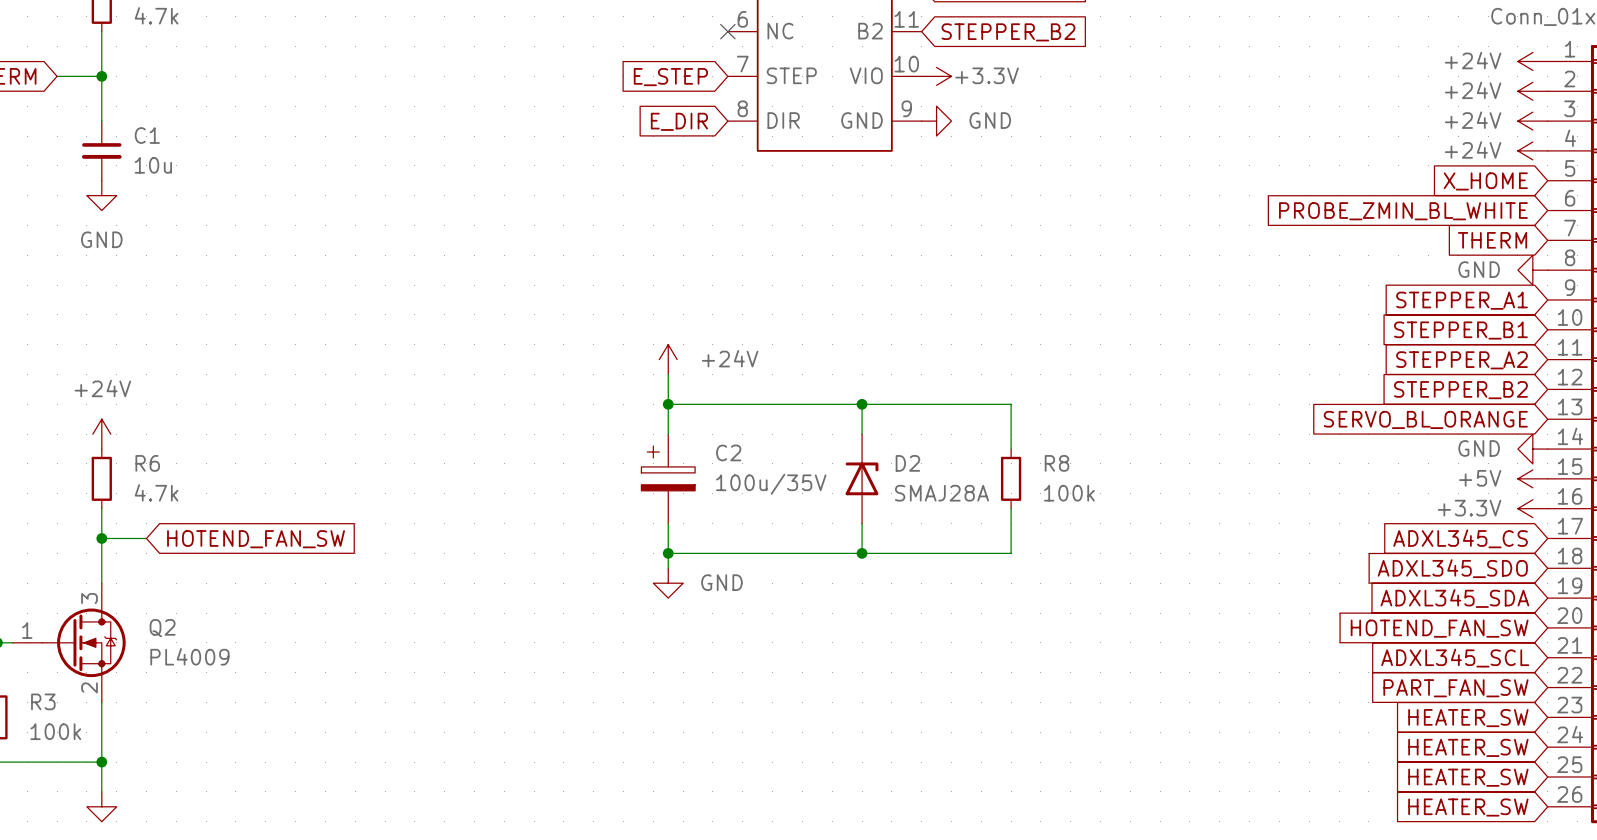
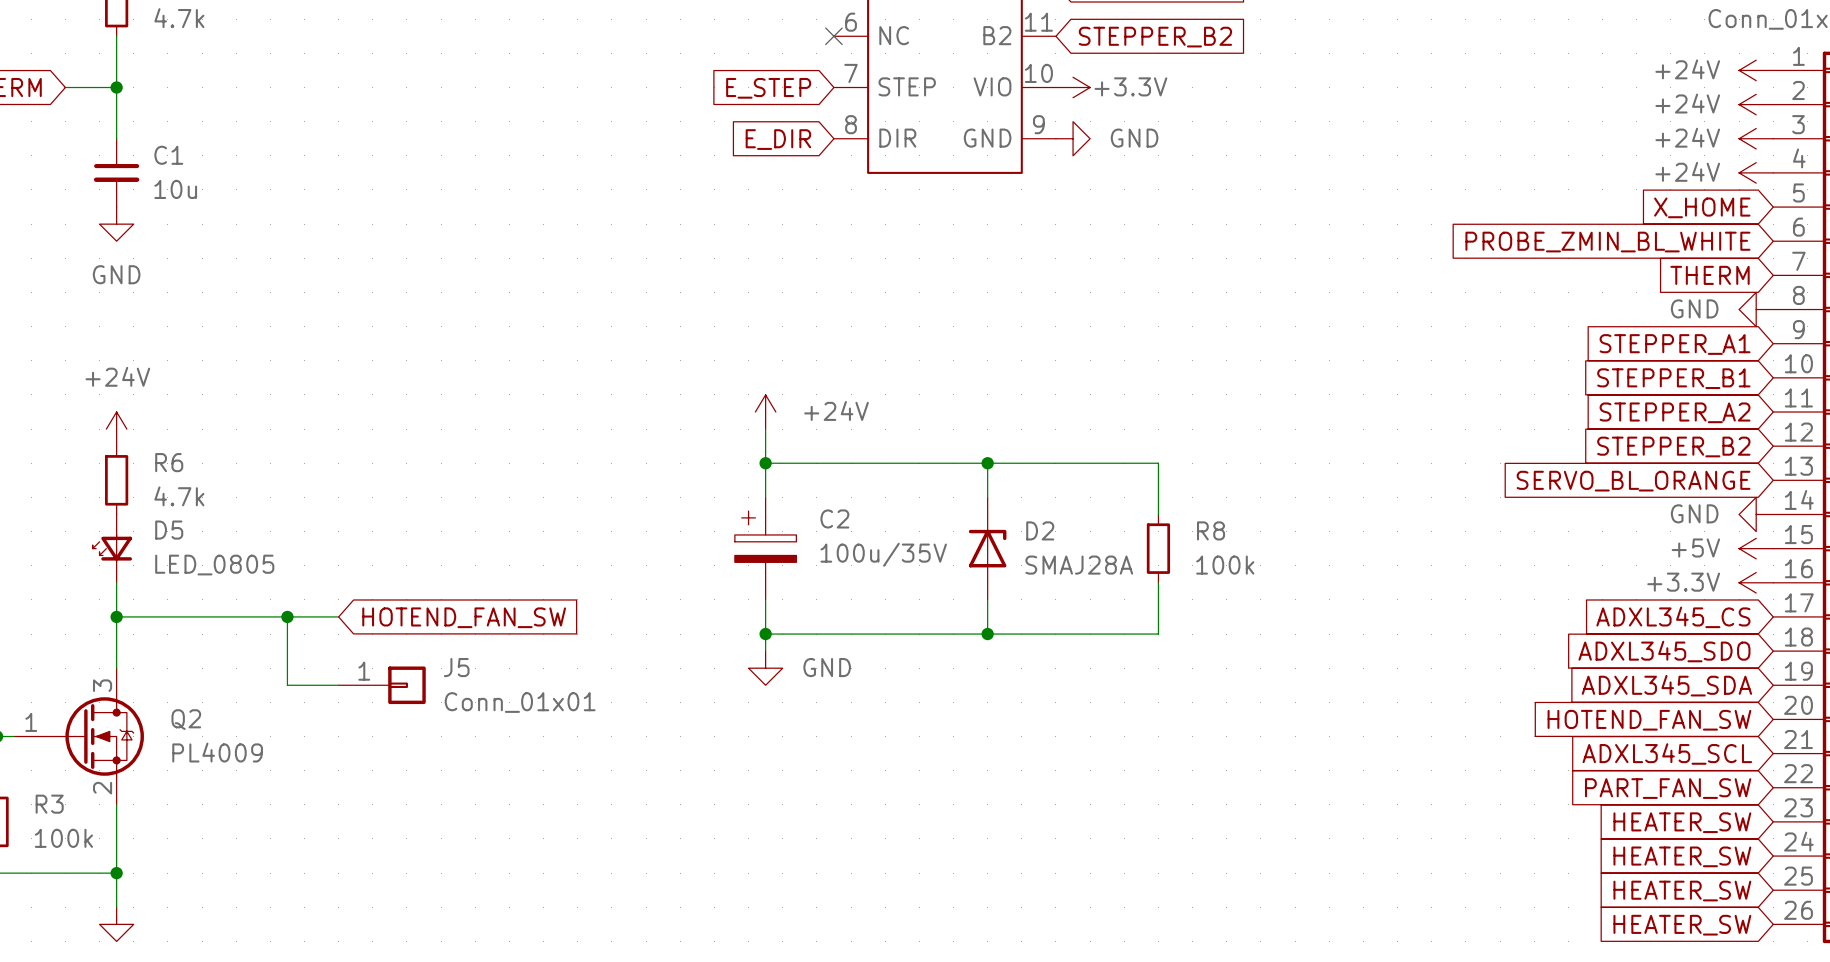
power symbol position: +24V (101, 434) -> +24V (116, 429)
D5: none -> LED_0805 (112, 548)
R6 position: (101, 478) -> (116, 480)
wire: none -> (167, 616) (338, 616)
wire: none -> (287, 616) (287, 685) (338, 685)
junction: none -> (287, 616)
global label position: HOTEND_FAN_SW (256, 539) -> HOTEND_FAN_SW (464, 617)
J5: none -> Conn_01x01 (382, 685)

